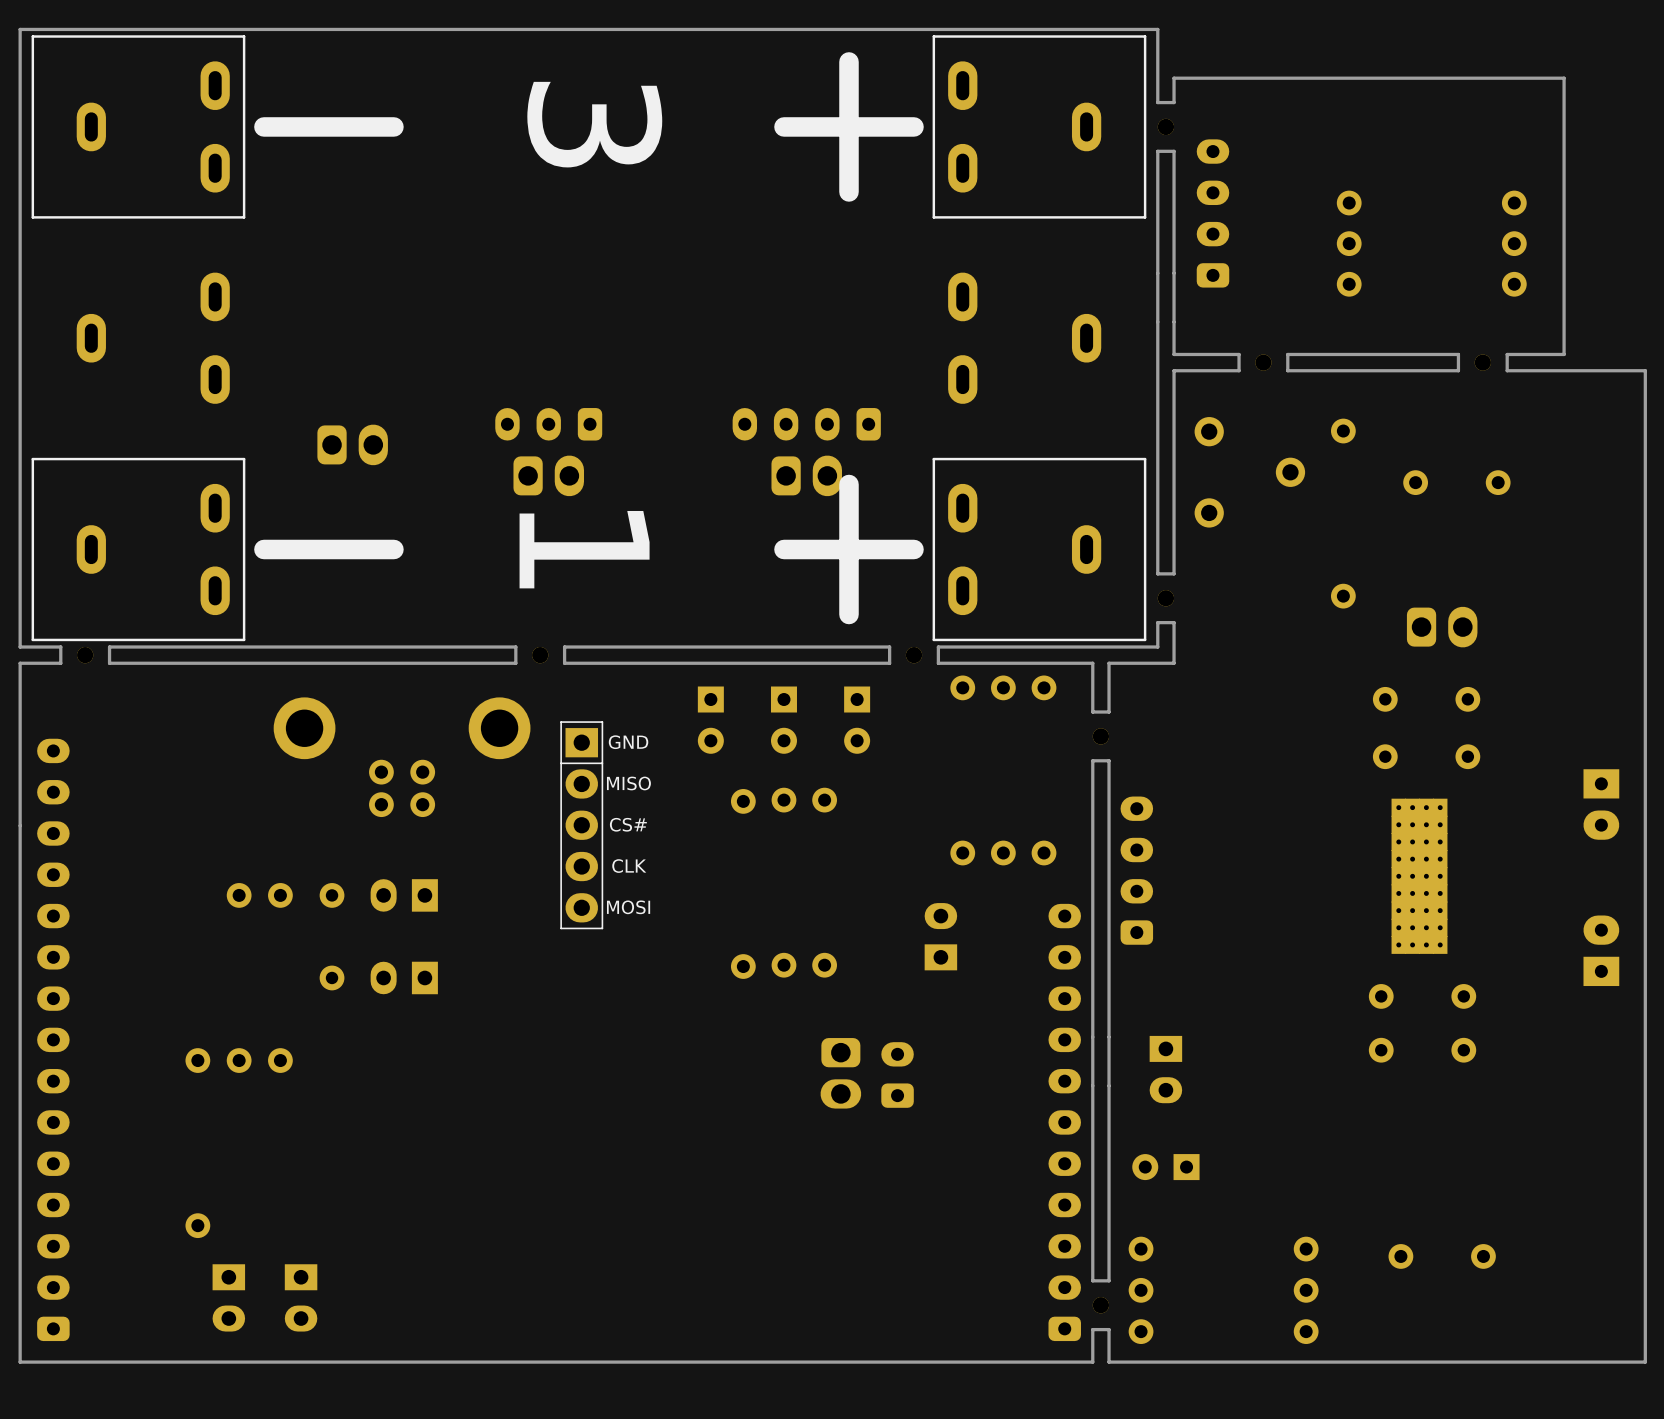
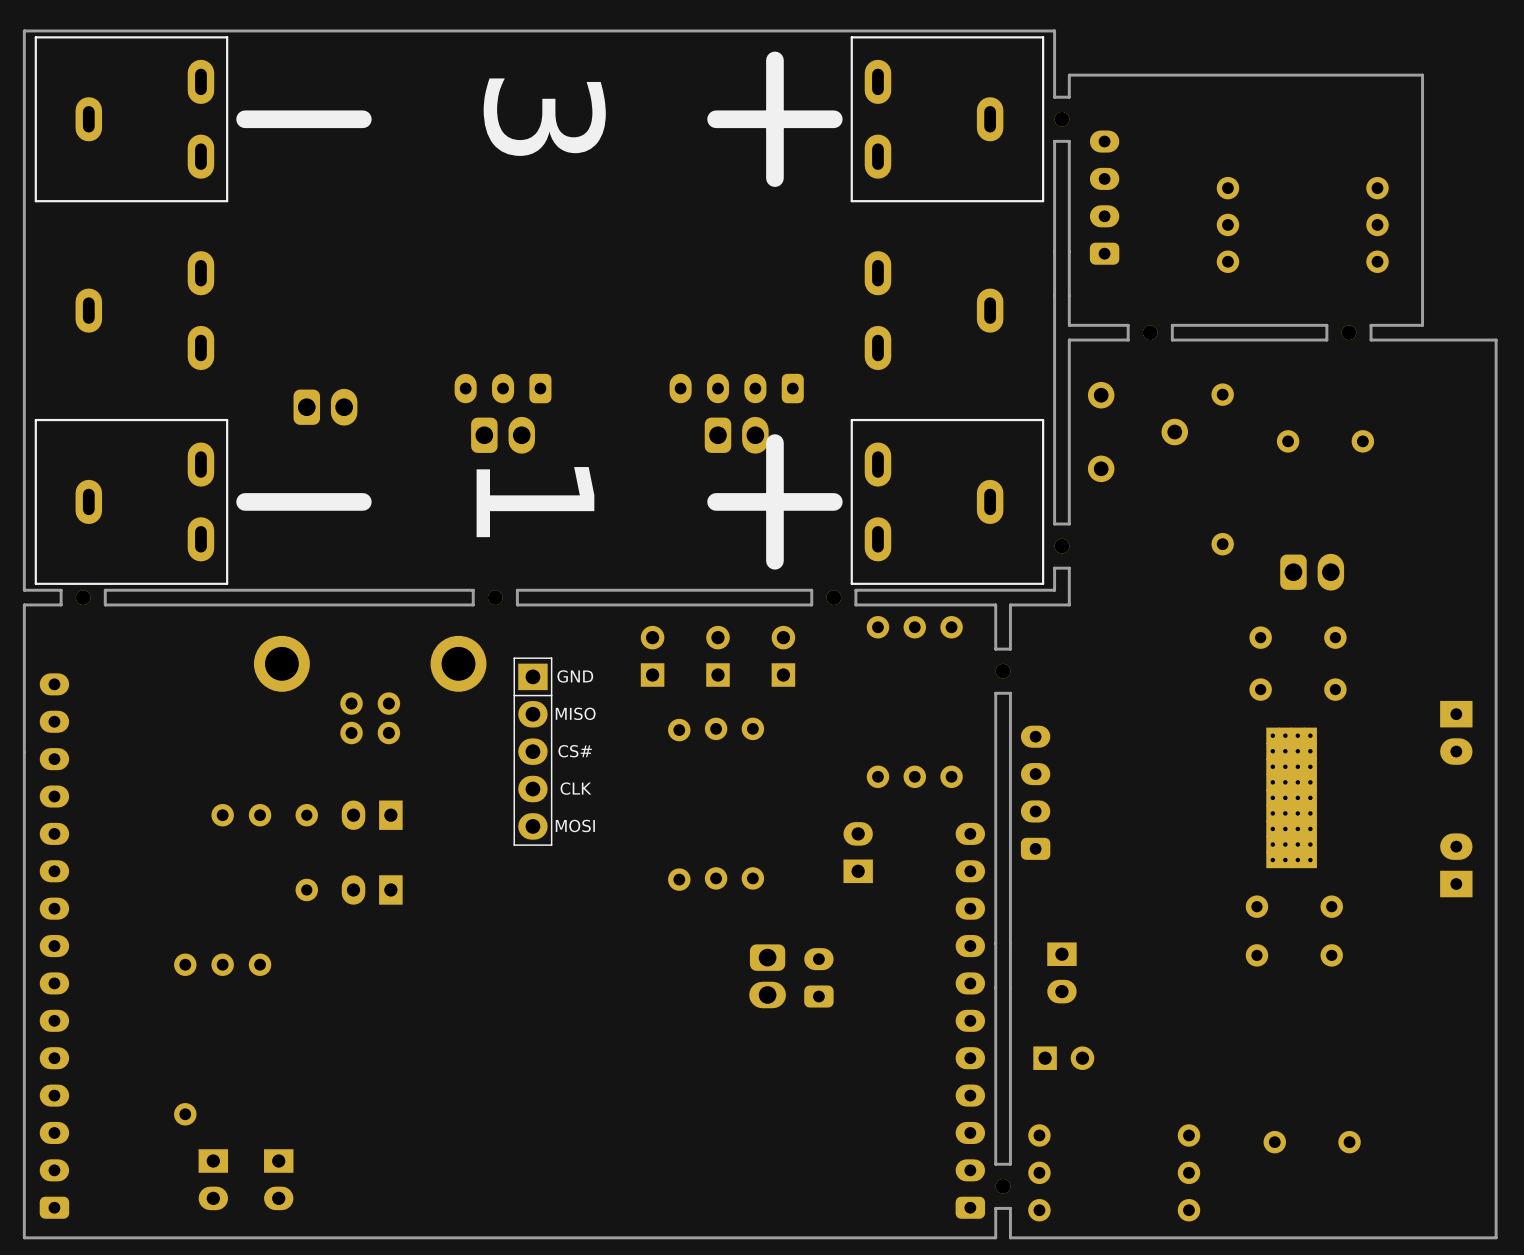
part footprint: [697, 686, 724, 754] -> [640, 625, 665, 687]
part footprint: [770, 686, 797, 754] -> [706, 625, 730, 687]
part footprint: [844, 686, 871, 754] -> [771, 625, 796, 687]
part footprint: [1132, 1154, 1200, 1181] -> [1033, 1046, 1095, 1070]

